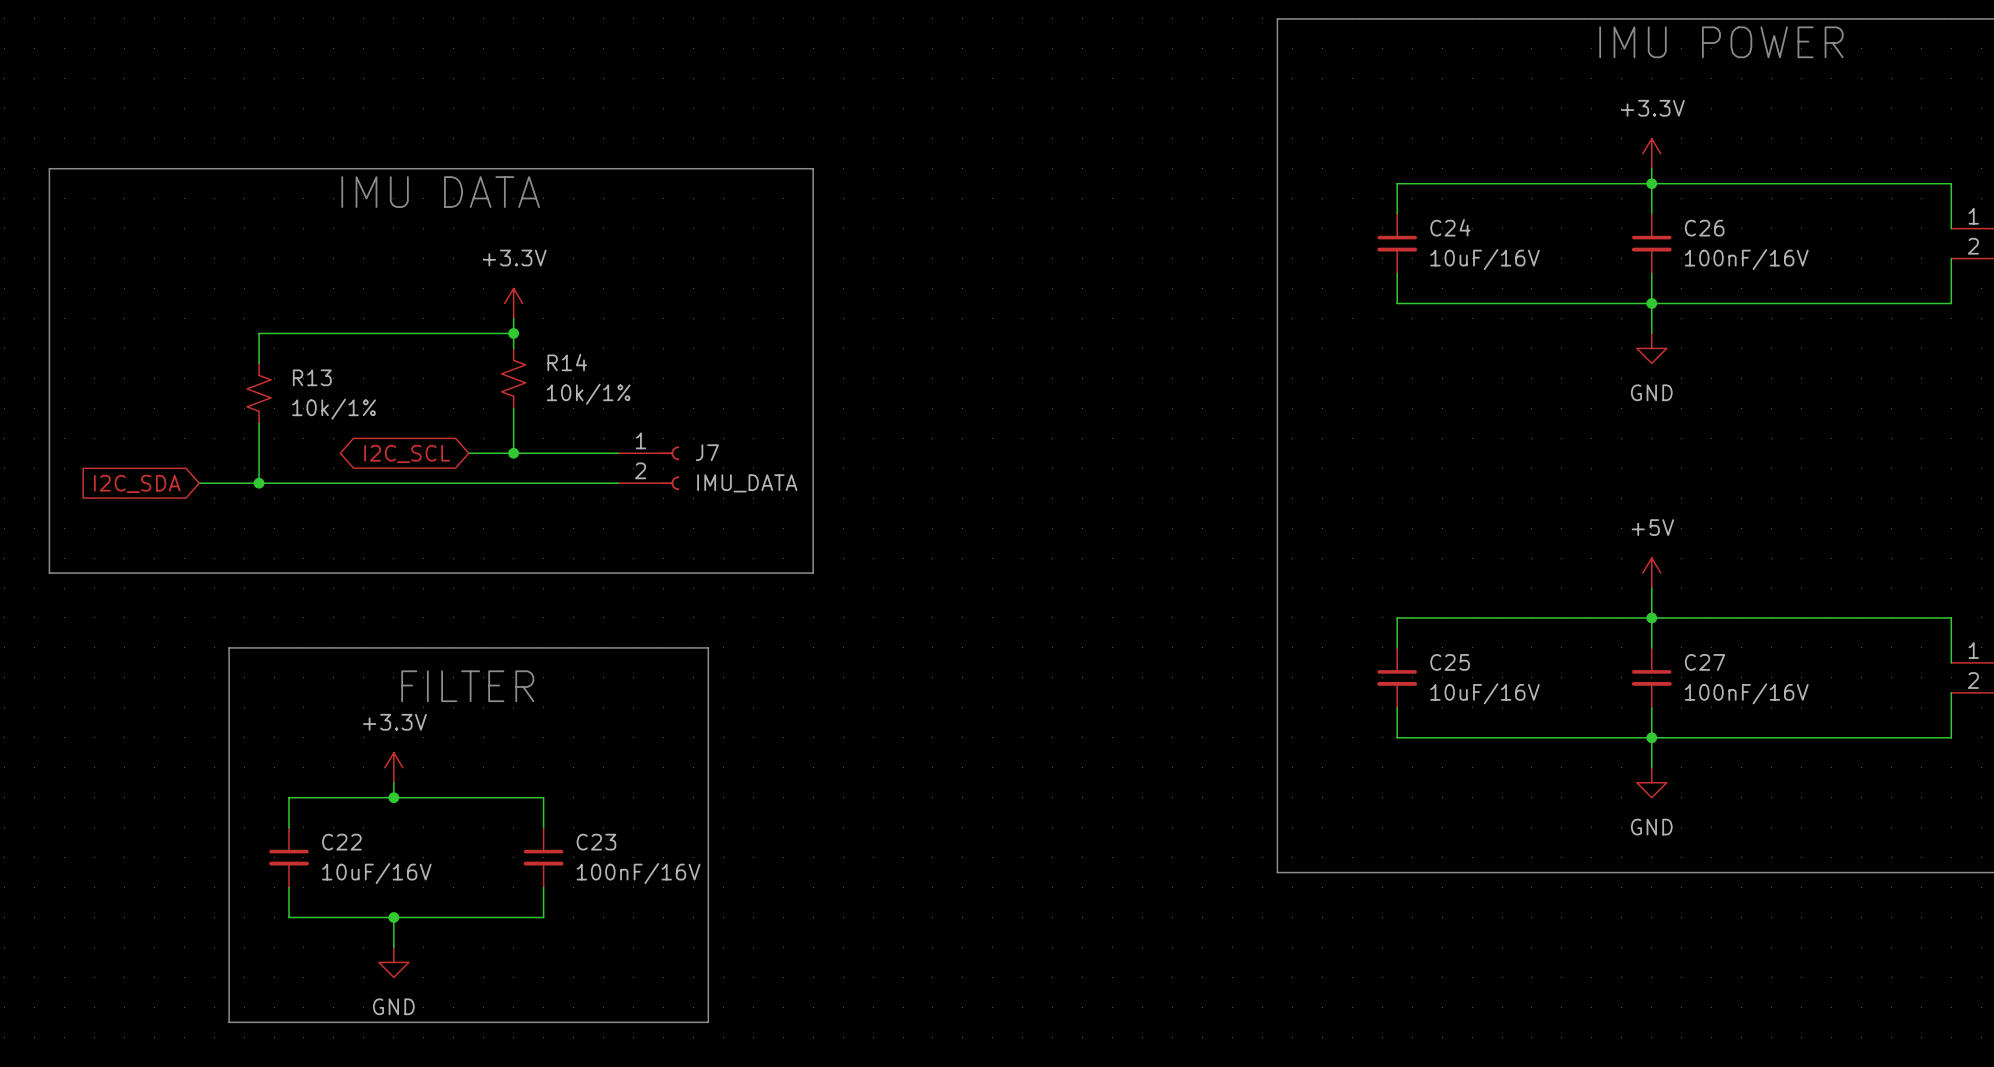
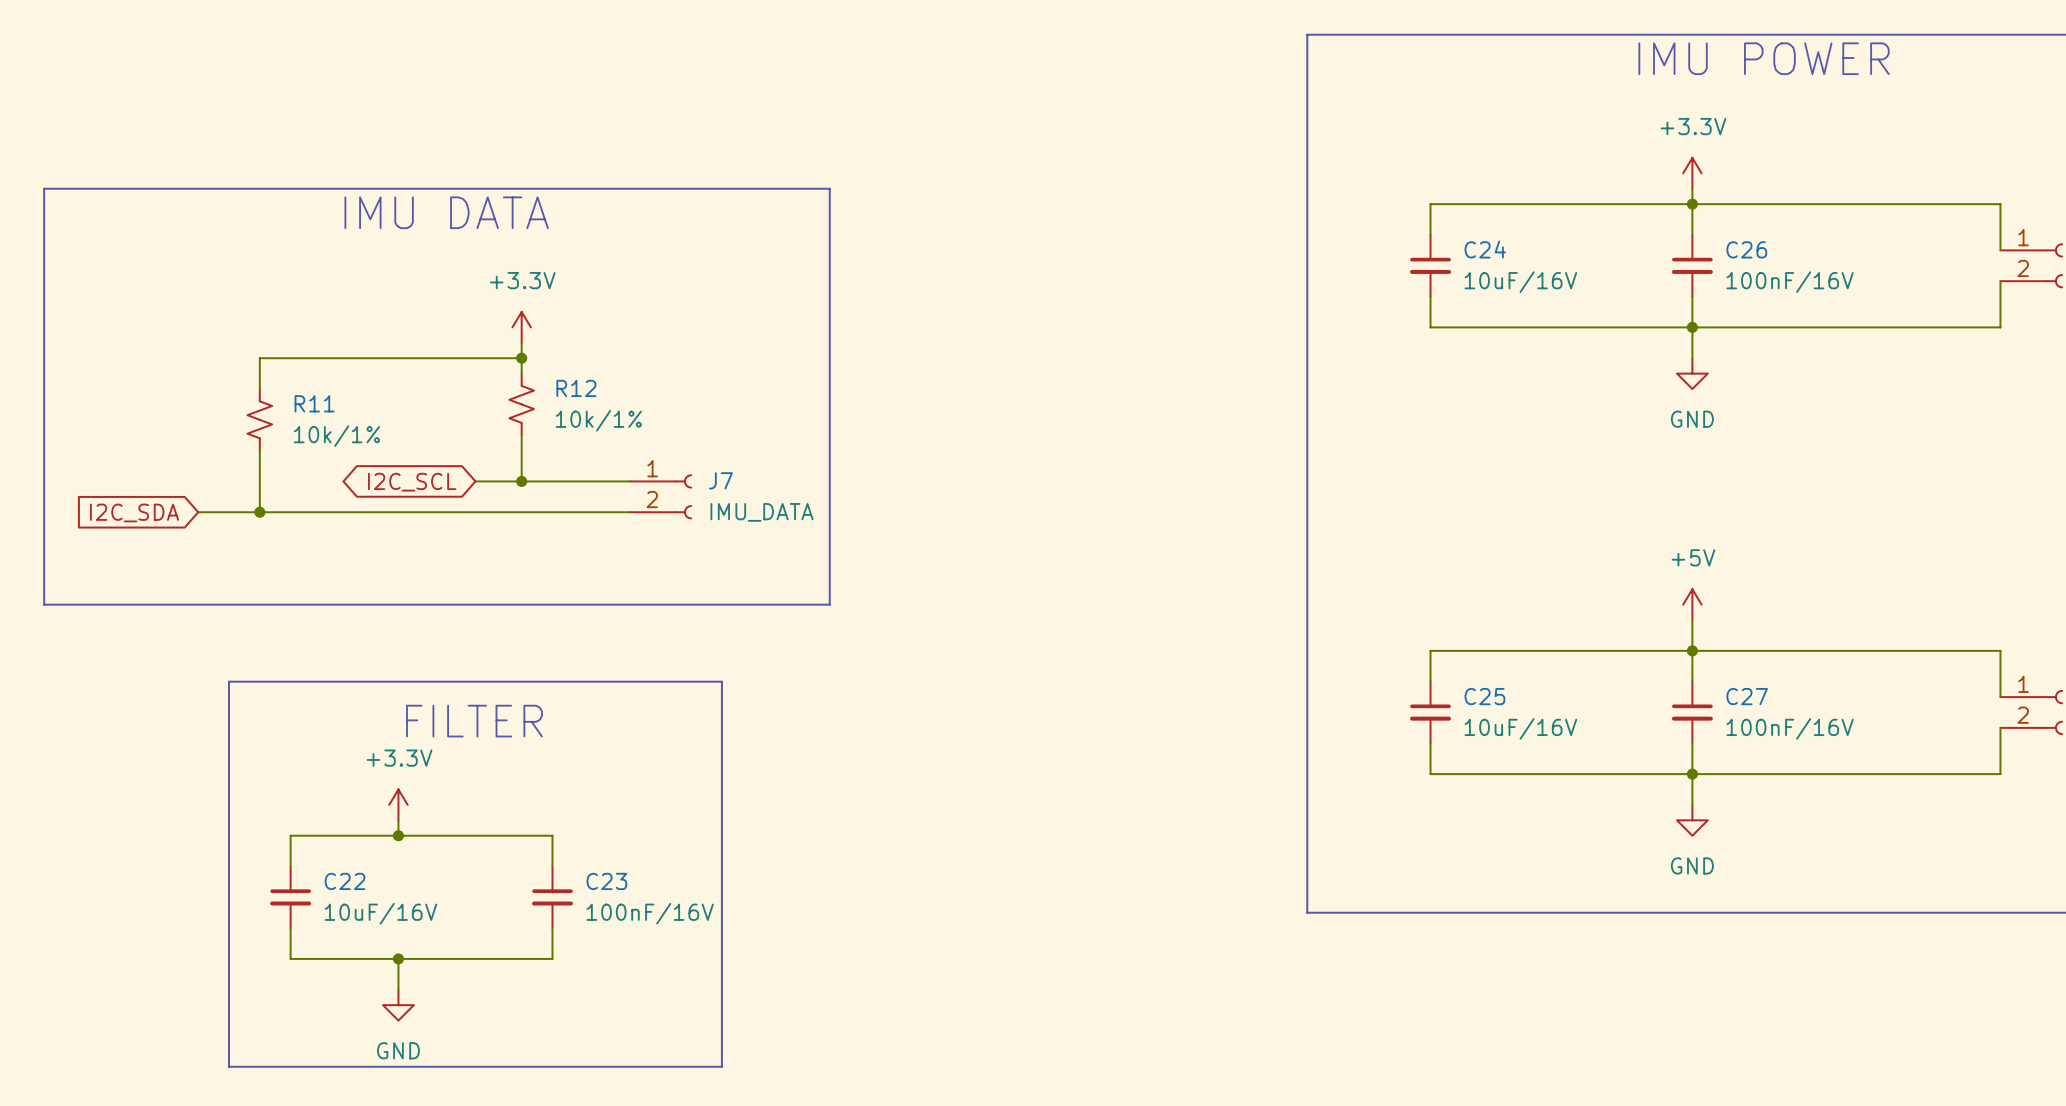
R14 name: R14 (567, 362) -> R12 (576, 388)
R13 name: R13 (312, 377) -> R11 (314, 403)

